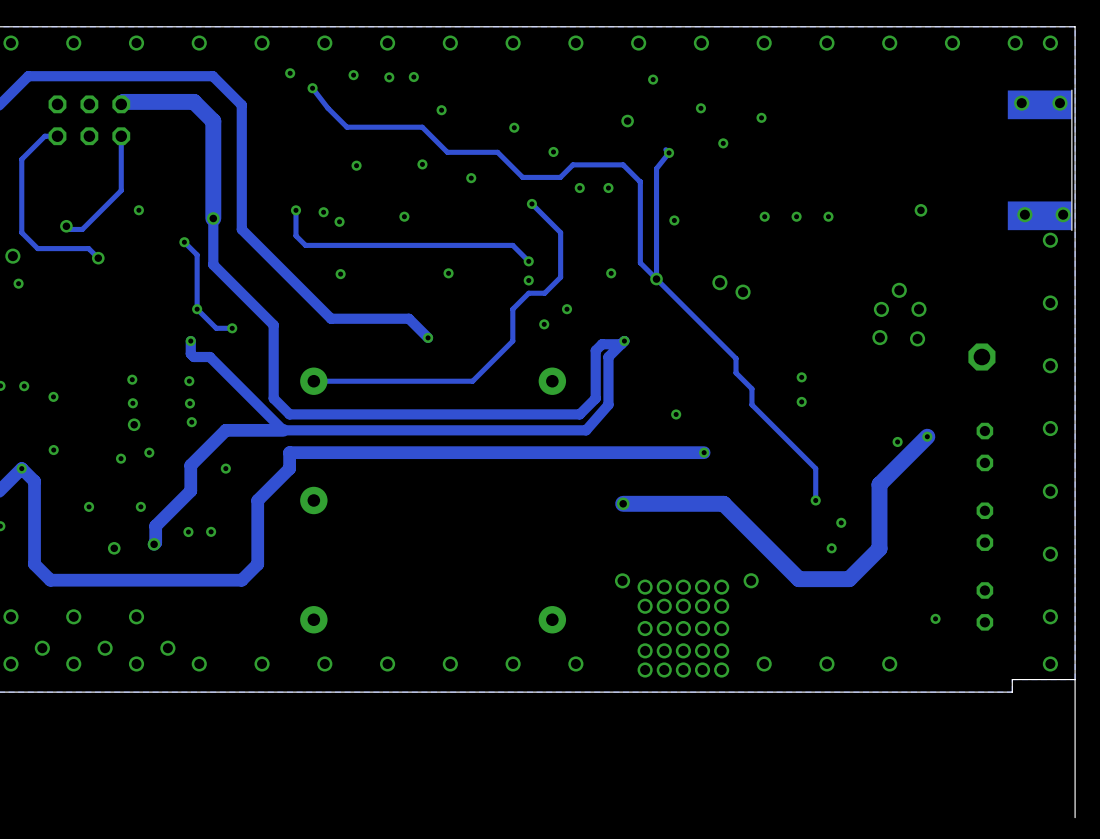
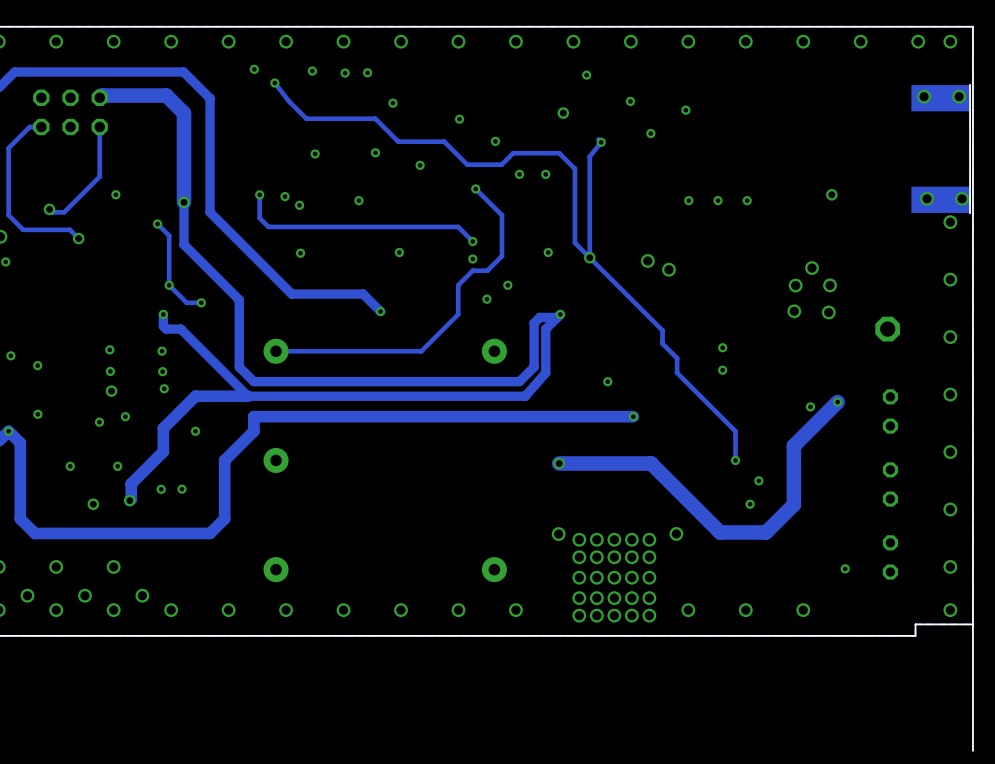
via: (674, 220) -> none

